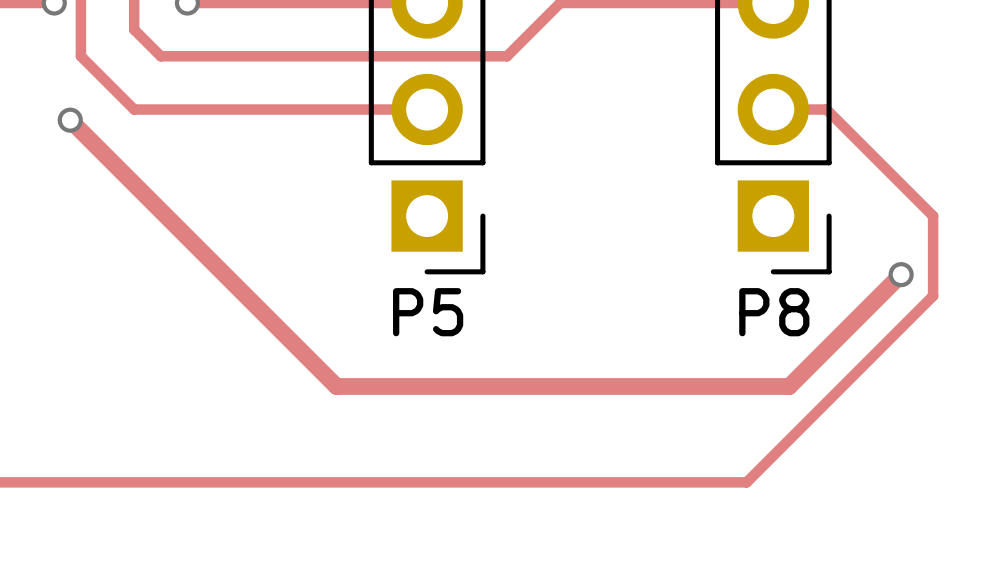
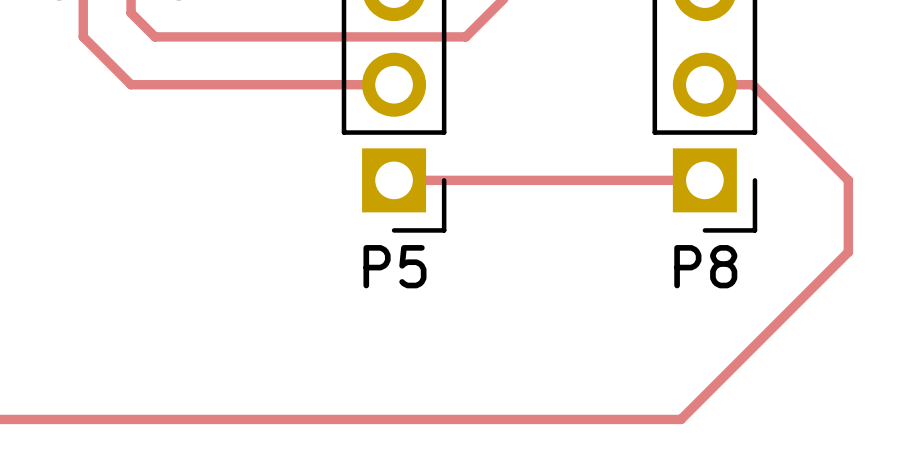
track: (70, 120) (336, 386) (789, 386) (901, 274) -> none
via: (70, 120) -> none
track: none -> (394, 180) (704, 180)
via: (901, 274) -> none

